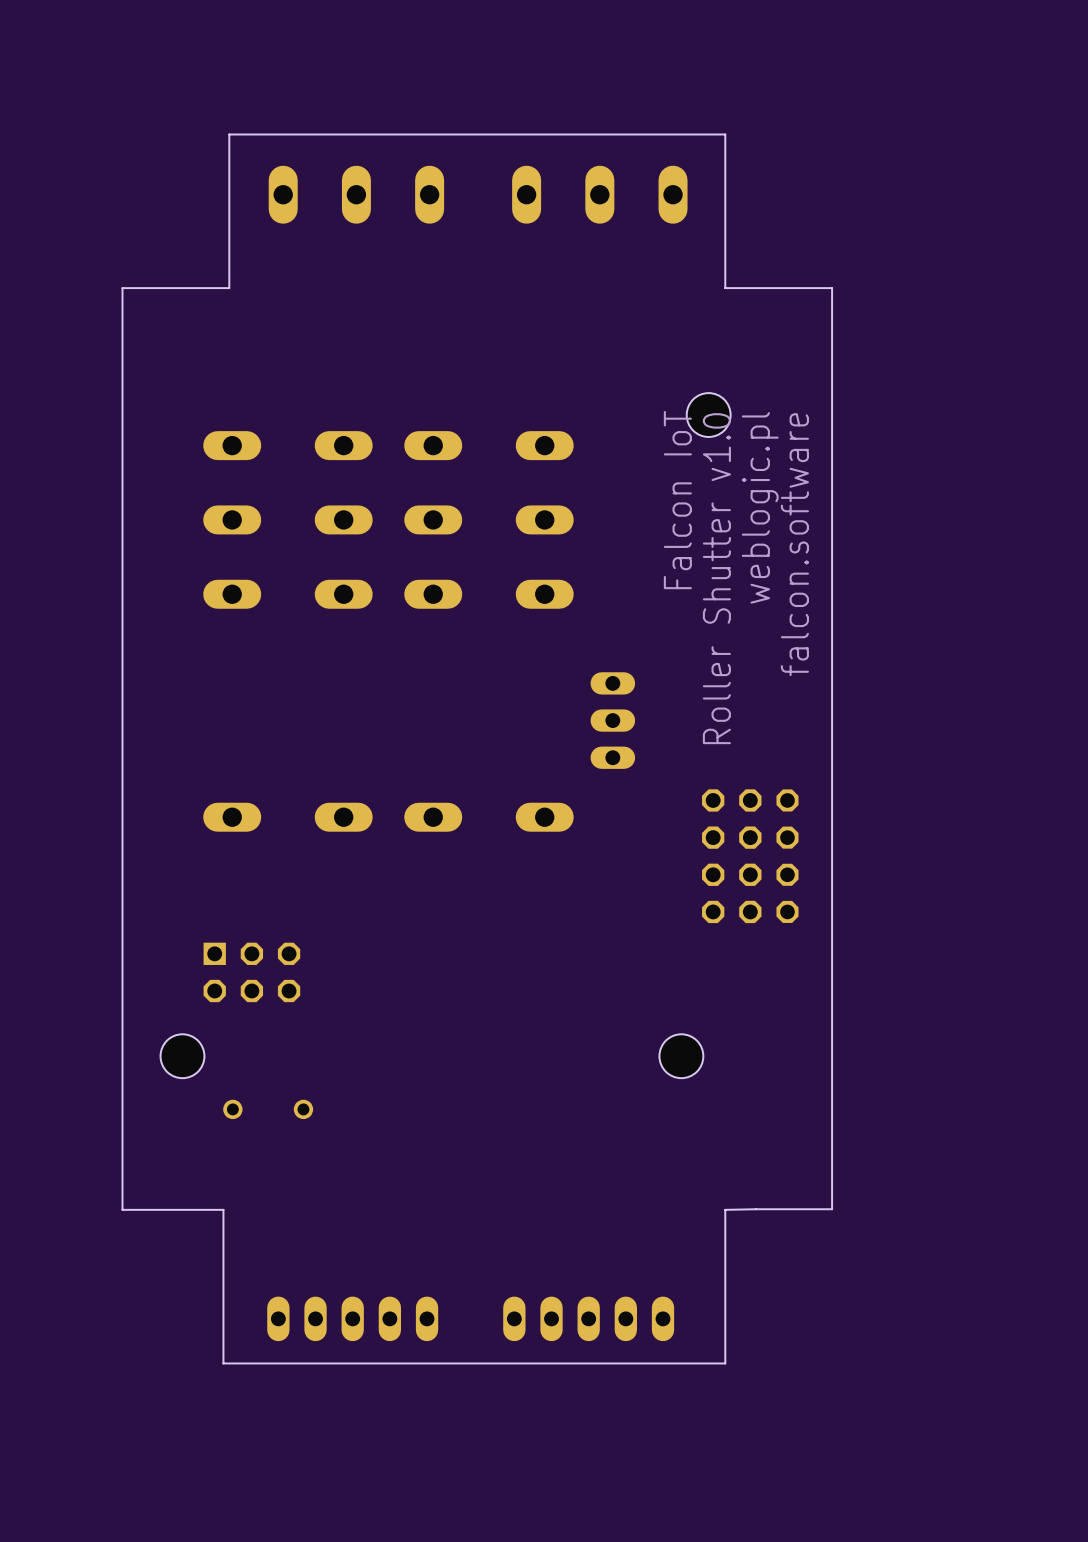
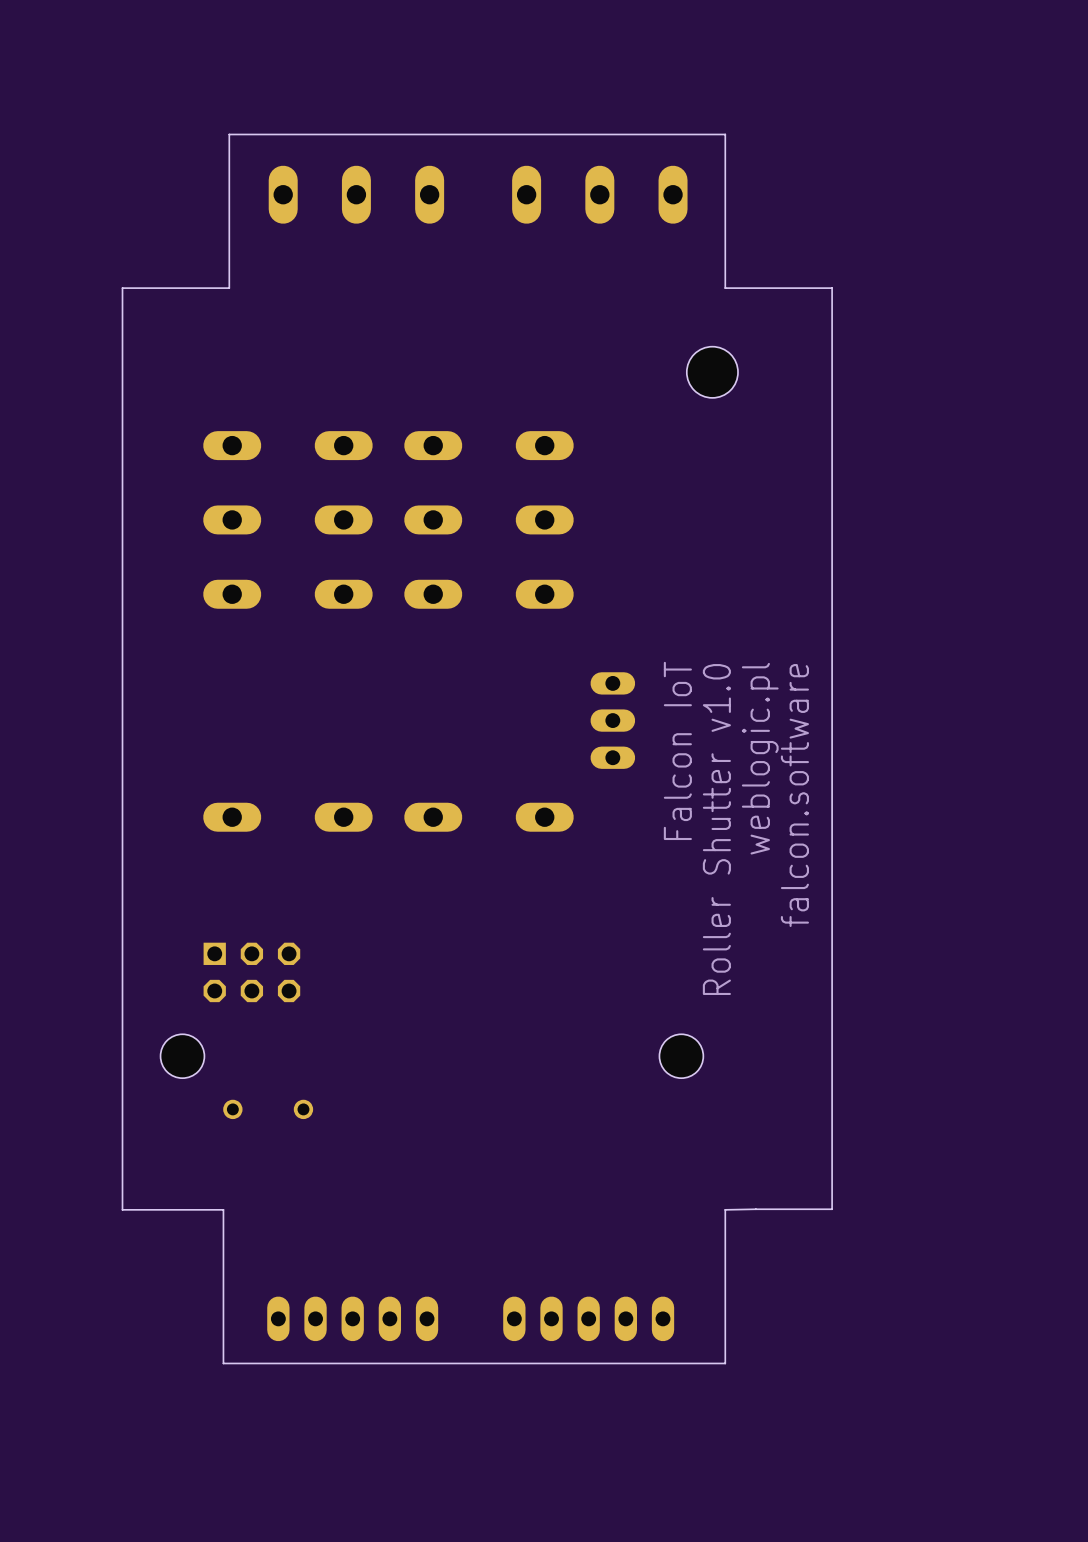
hole: none -> (712, 372)
hole: (708, 415) -> none
text position: Falcon IoT (677, 500) -> Falcon IoT (677, 750)
text position: weblogic.pl (760, 507) -> weblogic.pl (760, 758)
text position: falcon.software (794, 544) -> falcon.software (794, 795)
text position: Roller Shutter v1.0 (716, 578) -> Roller Shutter v1.0 (716, 829)
part: (750, 856) -> none

